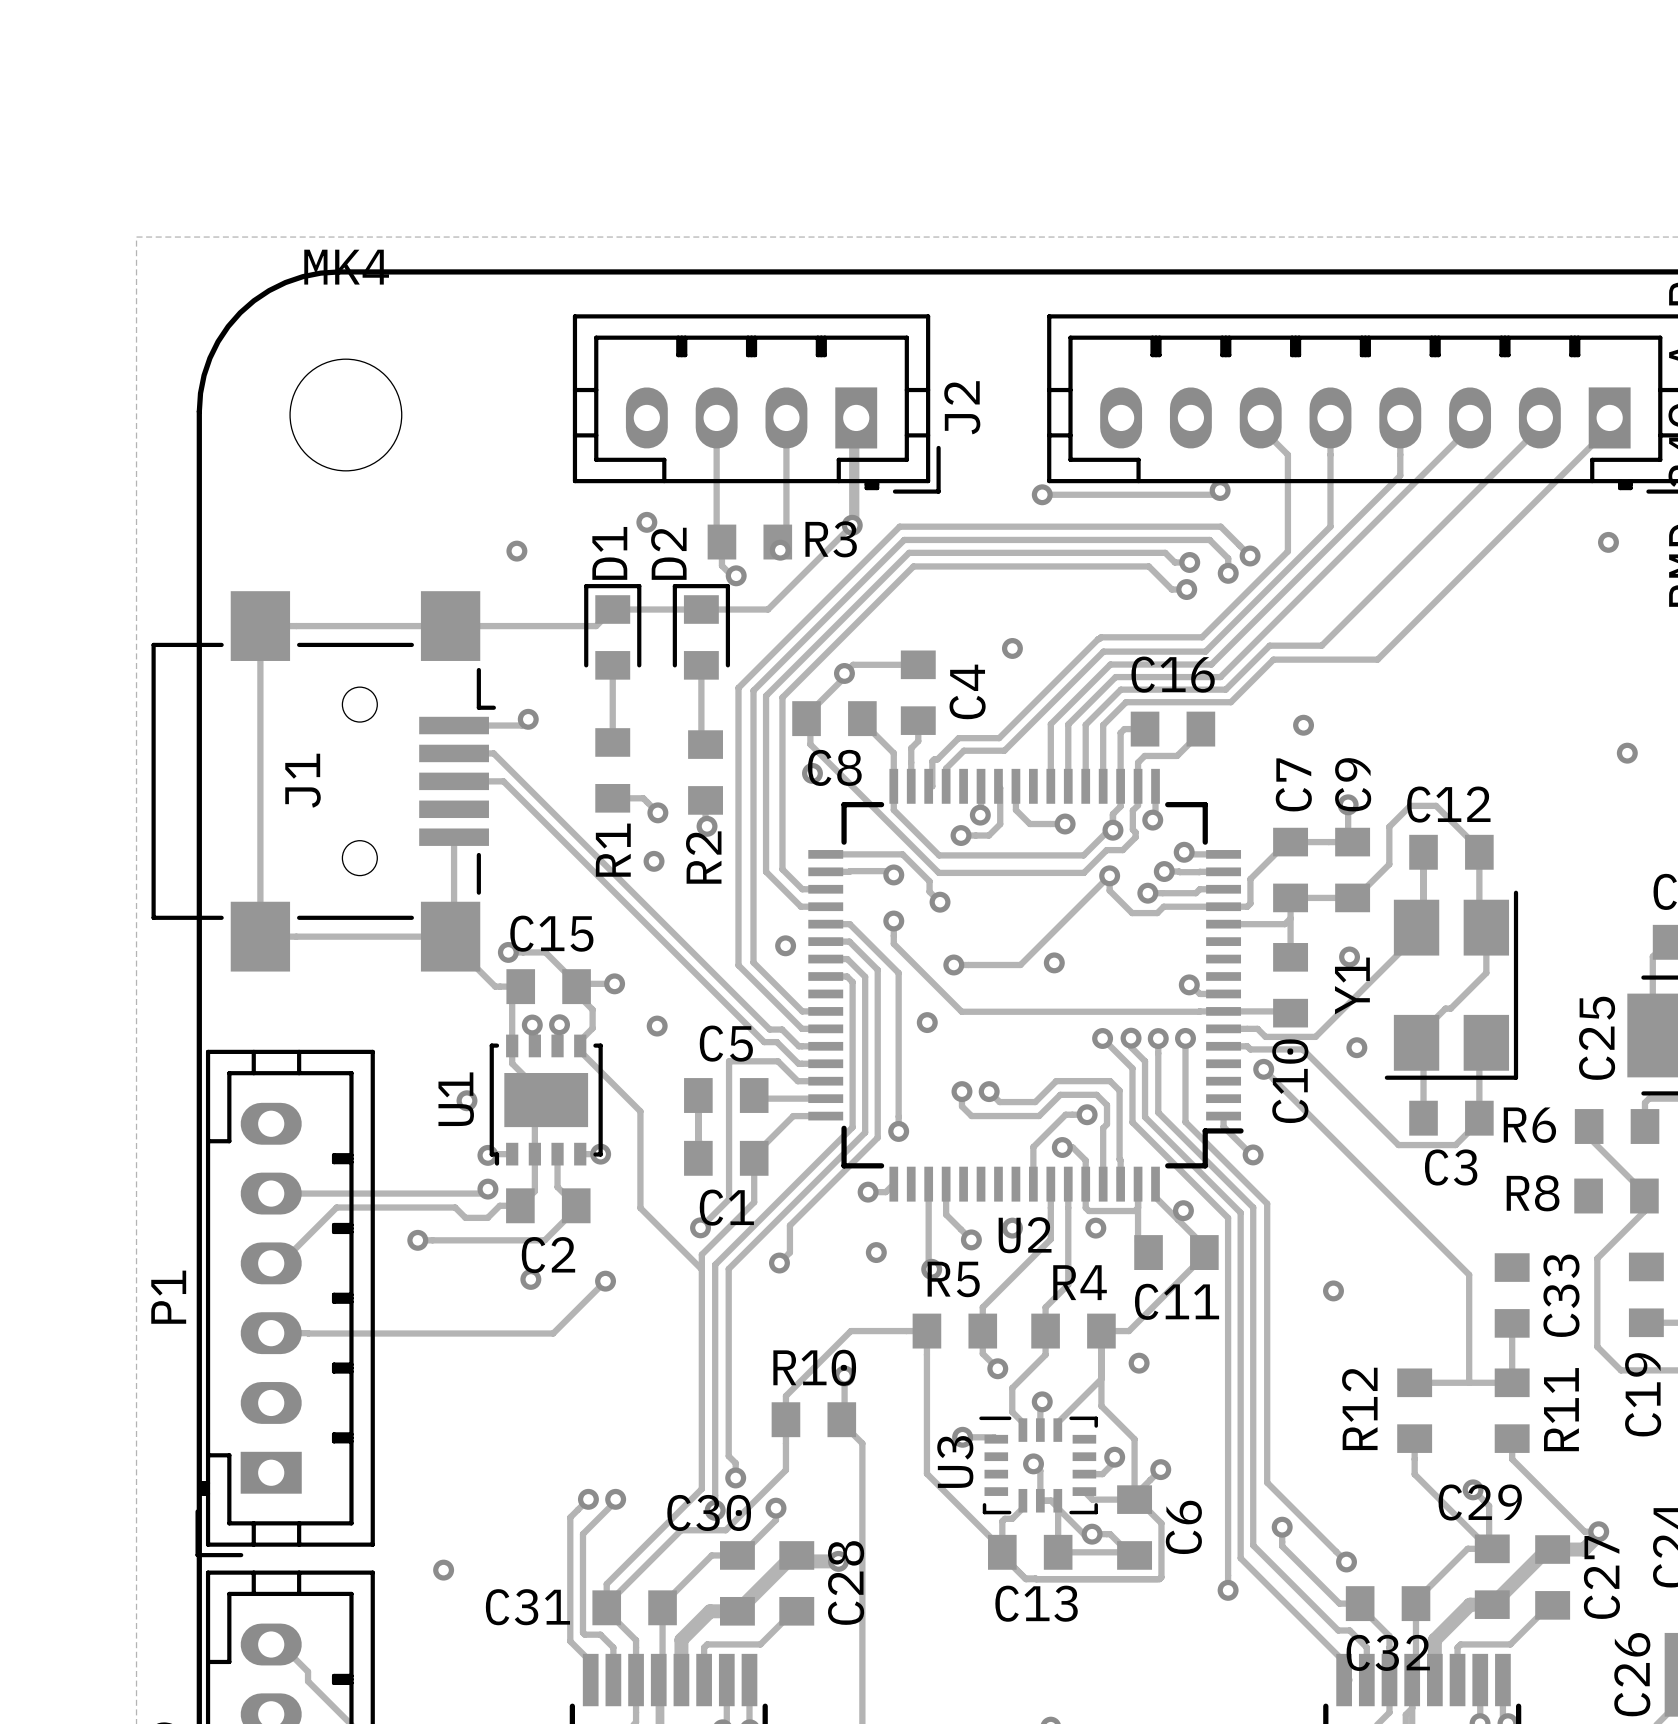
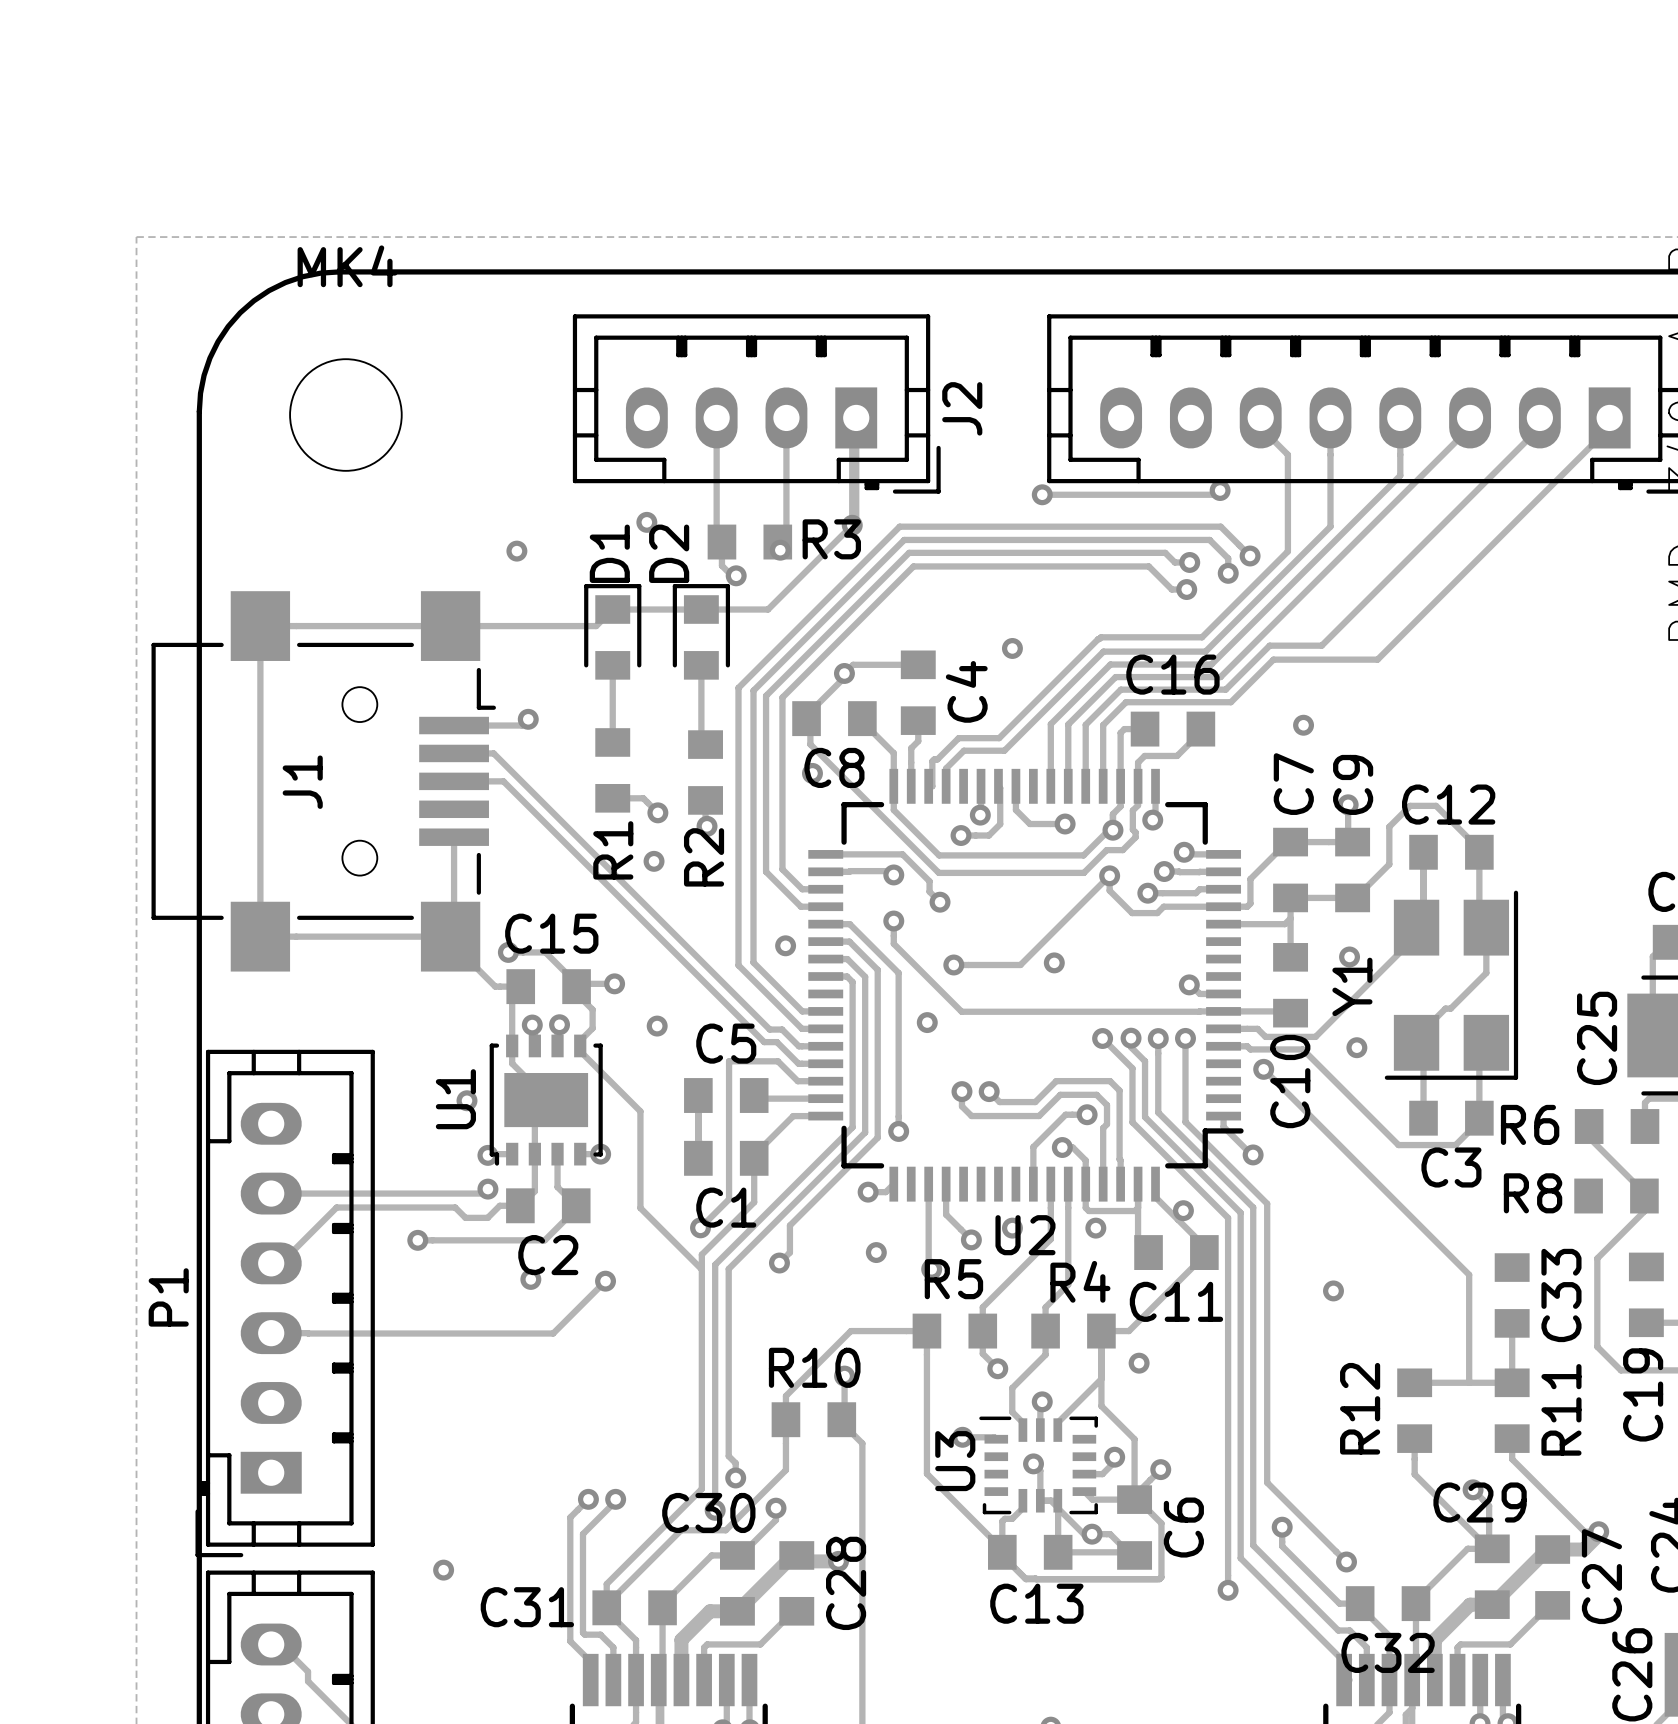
via: (1608, 542) -> none
via: (1627, 753) -> none

